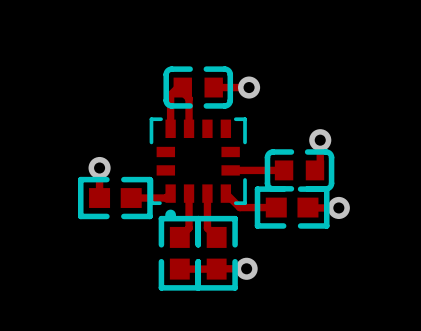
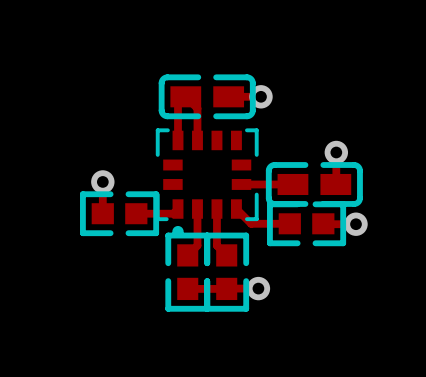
part footprint: [163, 66, 234, 109] -> [158, 74, 256, 120]
part footprint: [264, 149, 335, 192] -> [265, 162, 363, 207]

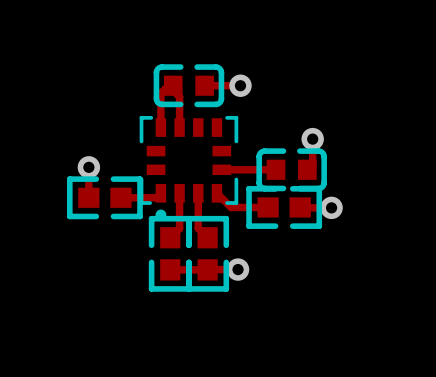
part footprint: [158, 74, 256, 120] -> [153, 64, 225, 108]
part footprint: [265, 162, 363, 207] -> [256, 148, 327, 192]

